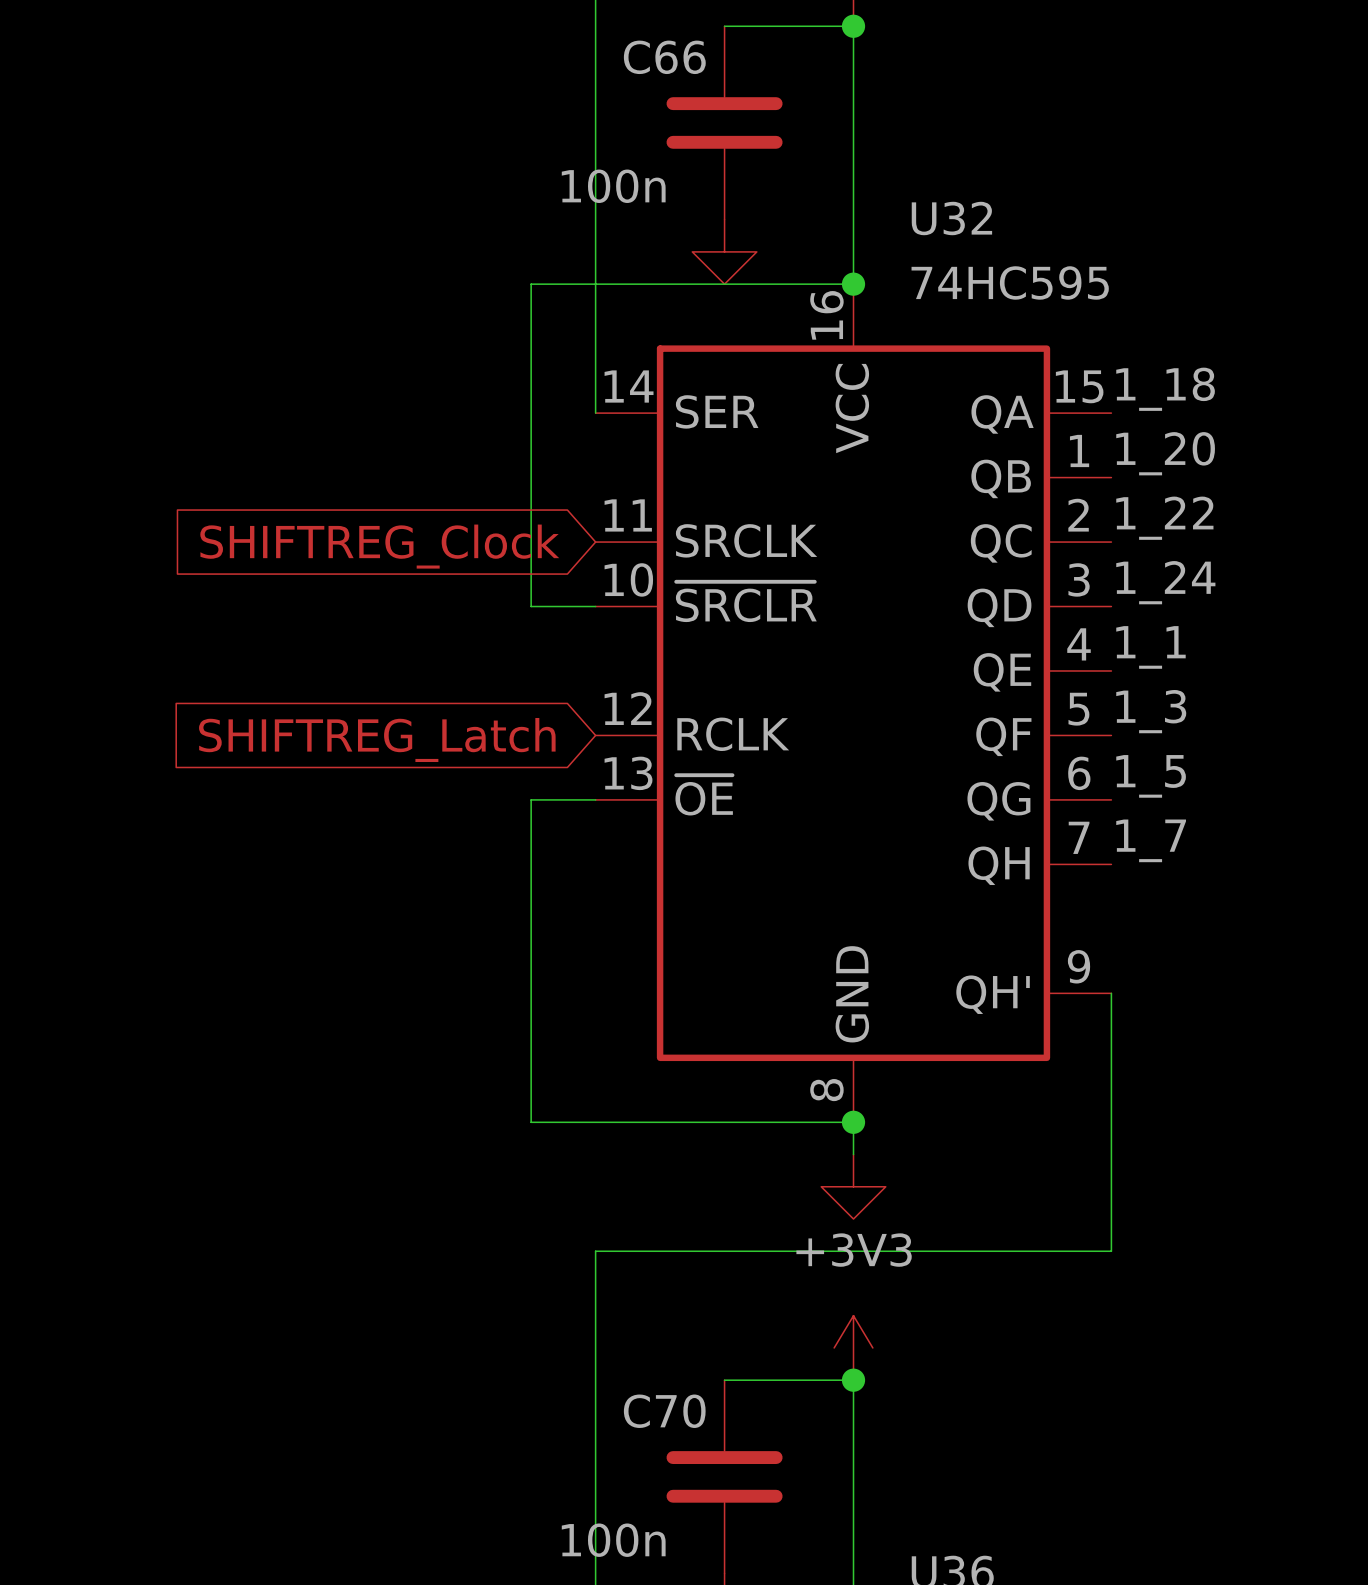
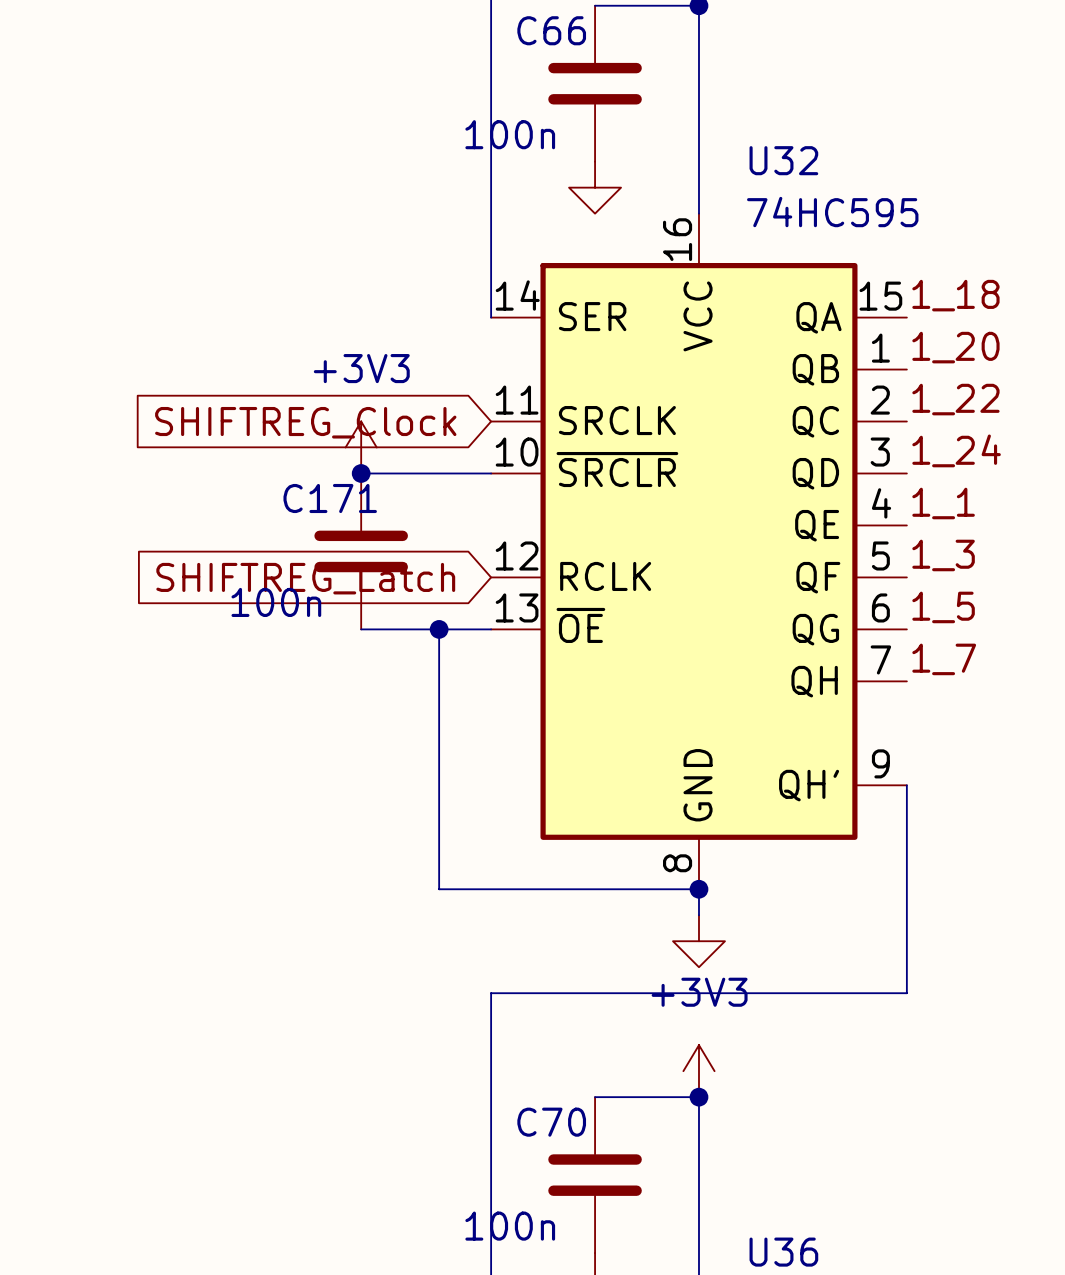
wire: (853, 284) (531, 284) (531, 606) -> (361, 473) (439, 473)
junction: (853, 284) -> none
power symbol: none -> +3V3 (361, 447)
junction: none -> (361, 473)
C171: none -> 100n (361, 551)
wire: none -> (361, 629) (439, 629)
junction: none -> (439, 629)

